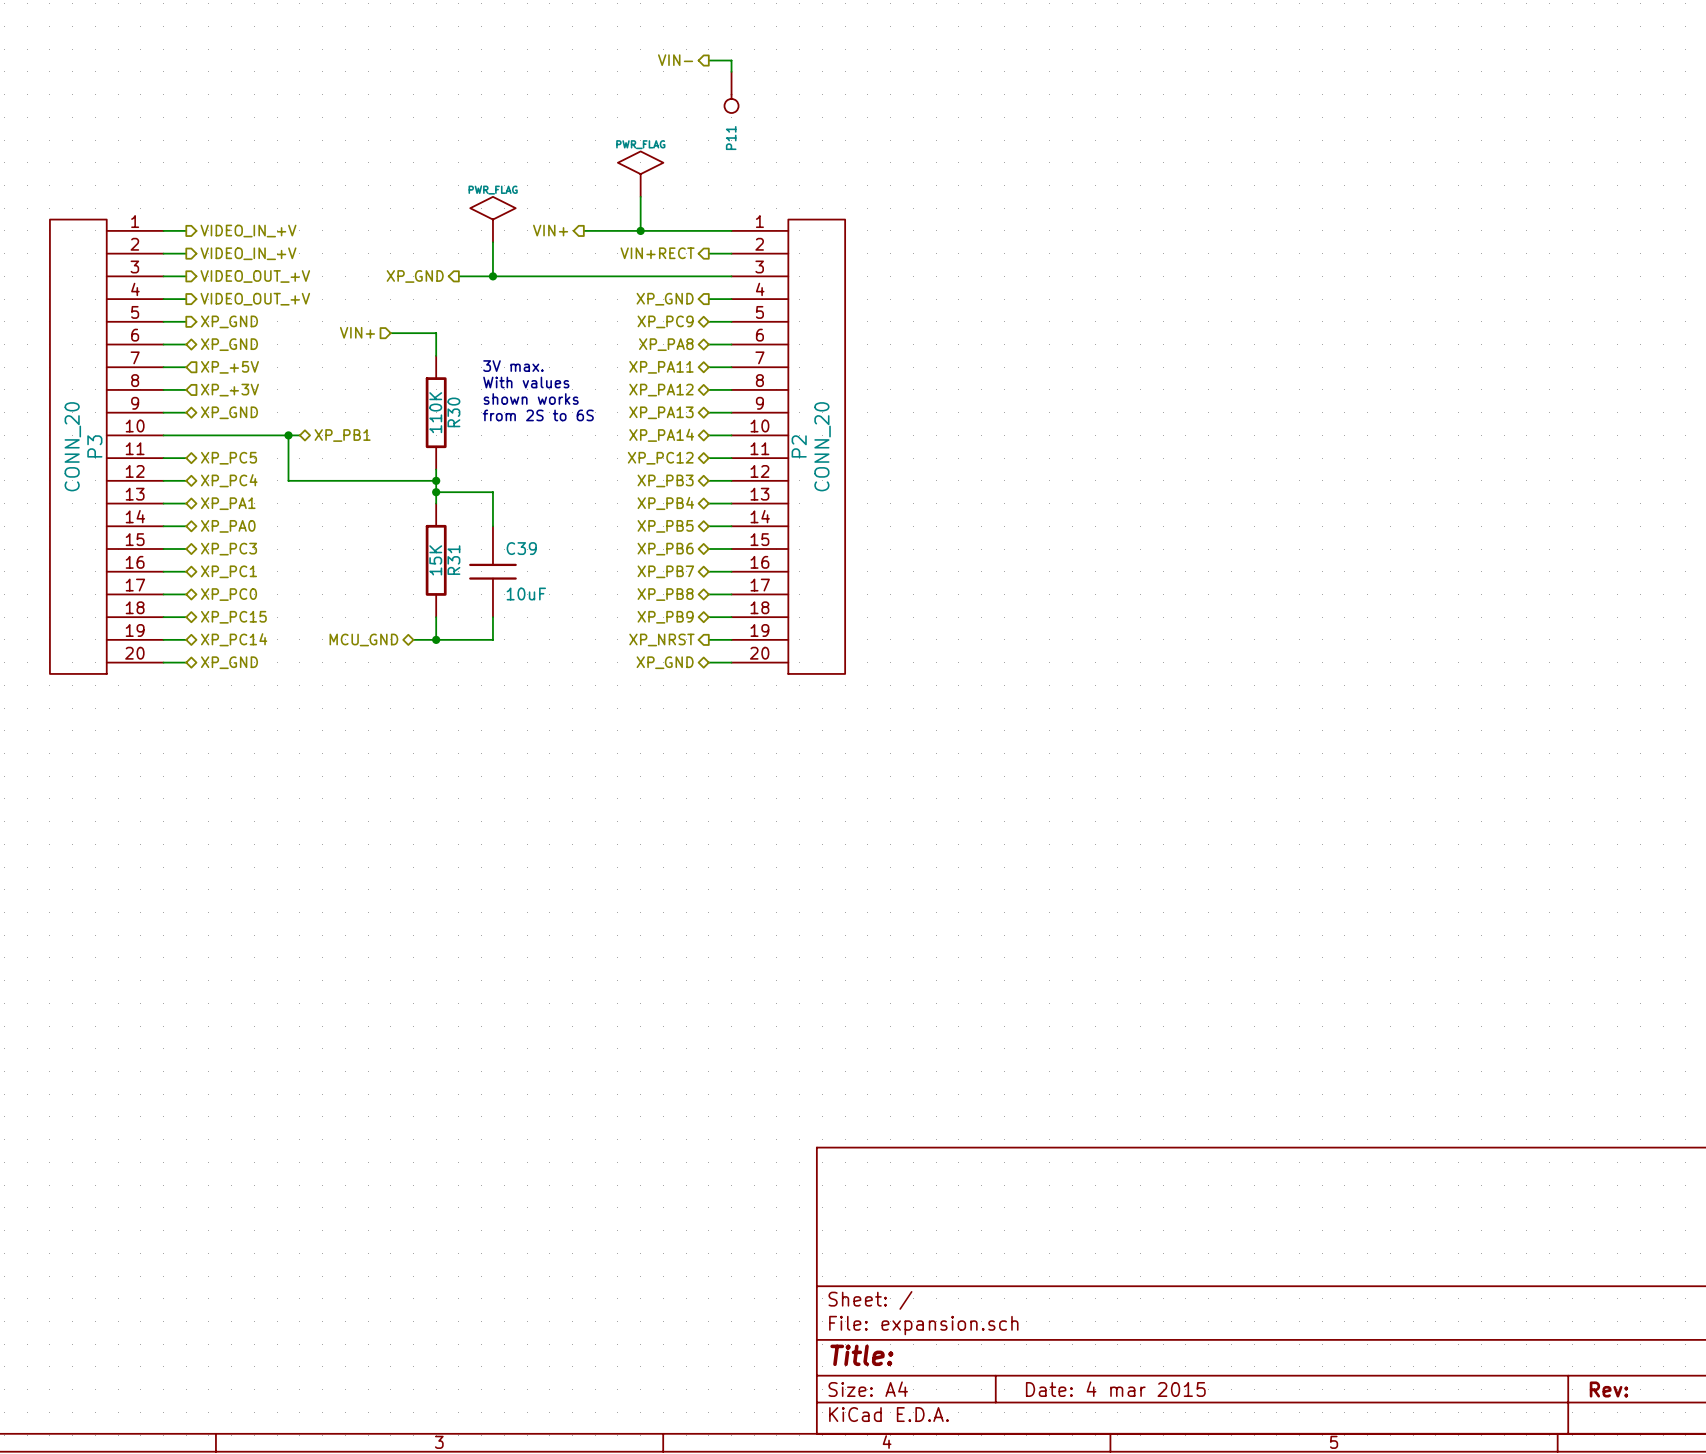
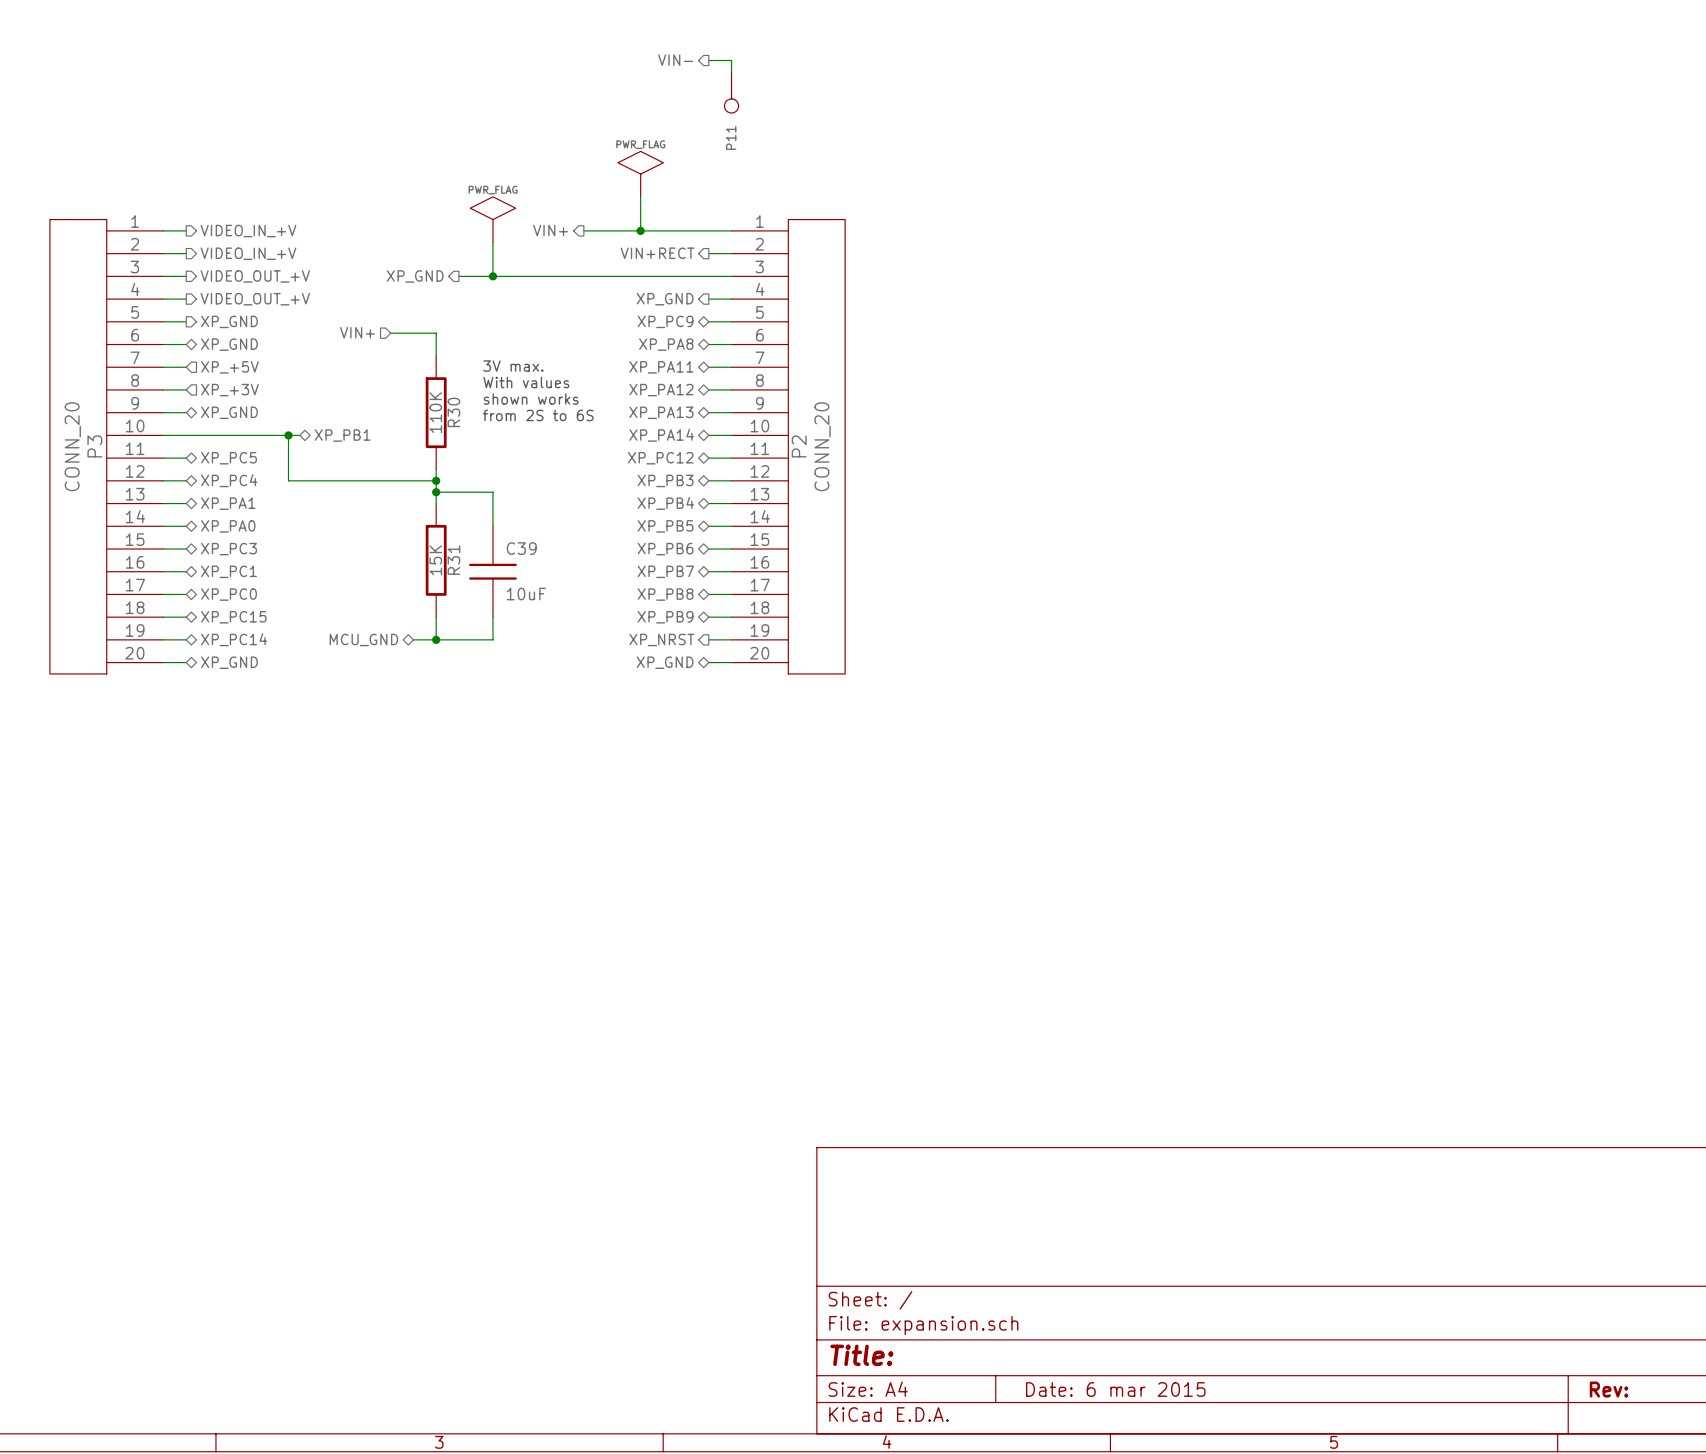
title block: Date: 4 mar 2015 (1115, 1389) -> Date: 6 mar 2015 (1115, 1389)

